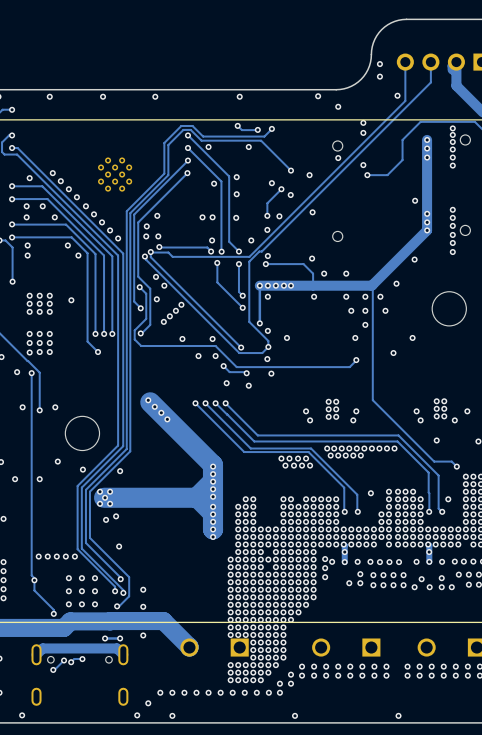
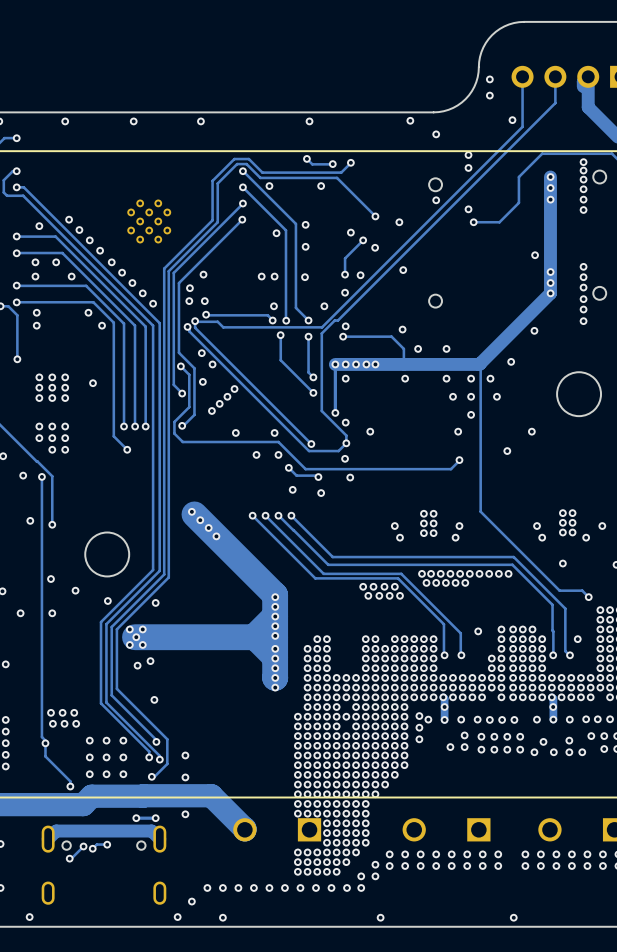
via: (29, 352) -> none
via position: (55, 407) -> (50, 579)
via: (65, 556) -> none
via: (74, 556) -> none
via: none -> (52, 723)
via: none -> (64, 723)
via: none -> (76, 723)

